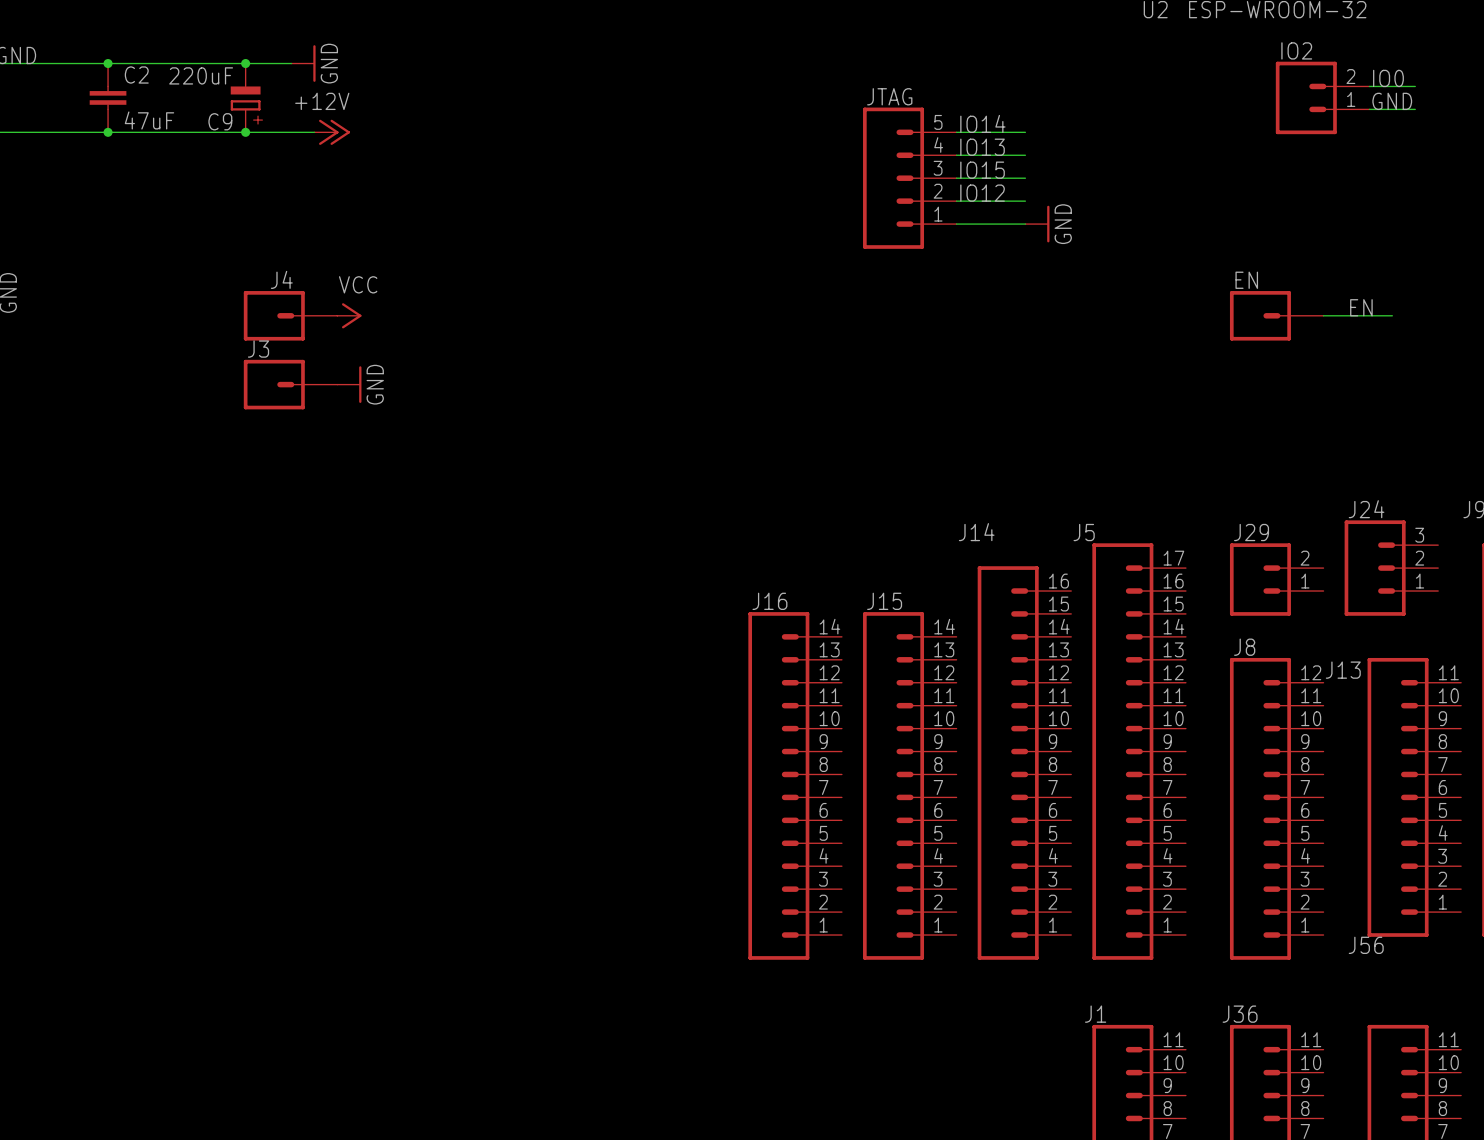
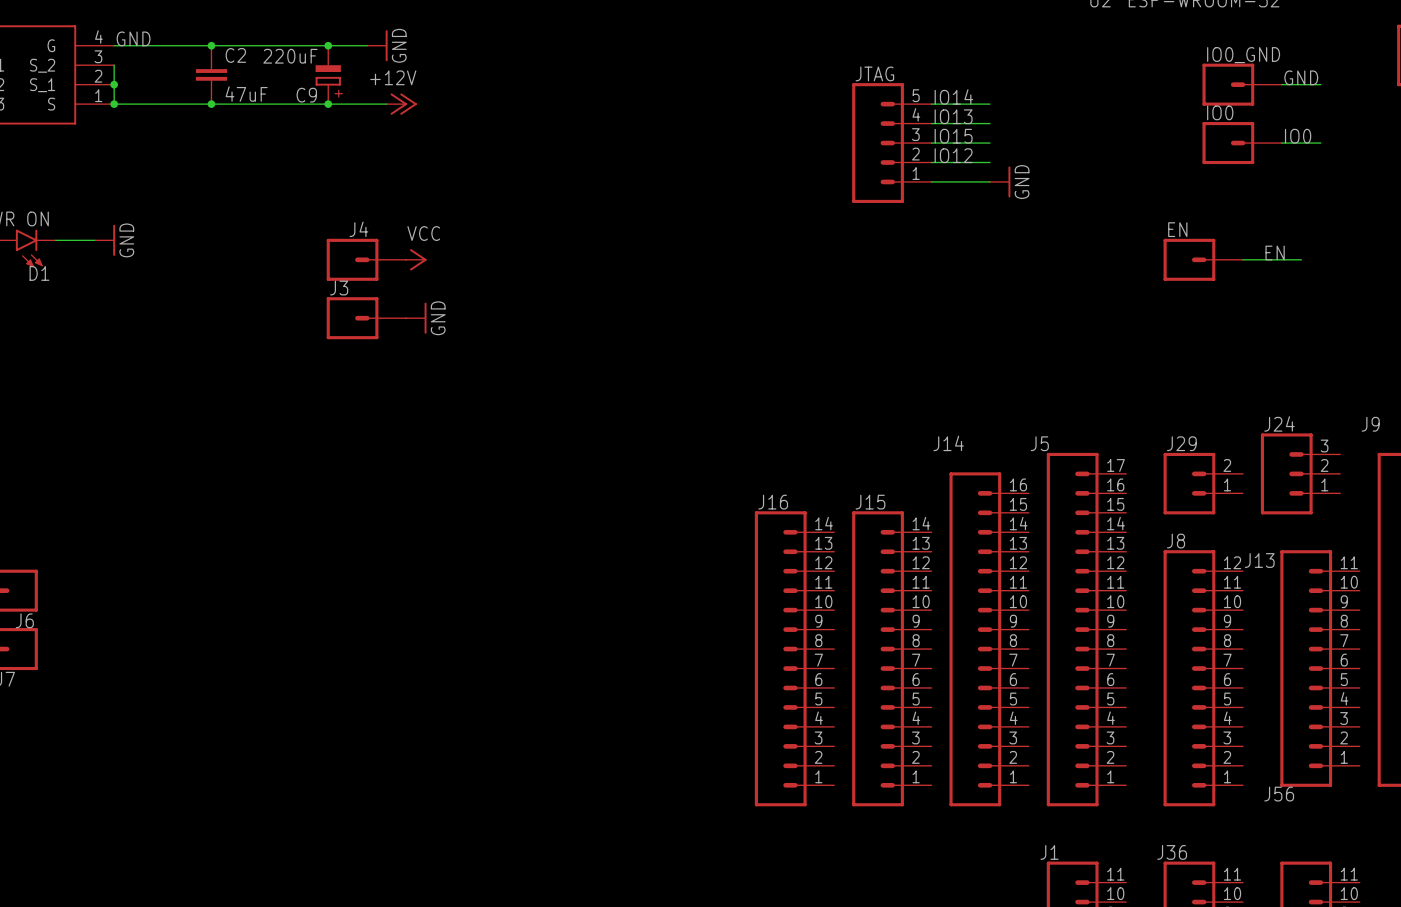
label position: IO0 (1388, 78) -> IO0 (1298, 136)
wire: (1369, 86) (1415, 86) -> (1281, 143) (1320, 143)
IO2: (1322, 97) -> none
IO0_GND: none -> (1242, 84)
IO0: none -> (1242, 143)

